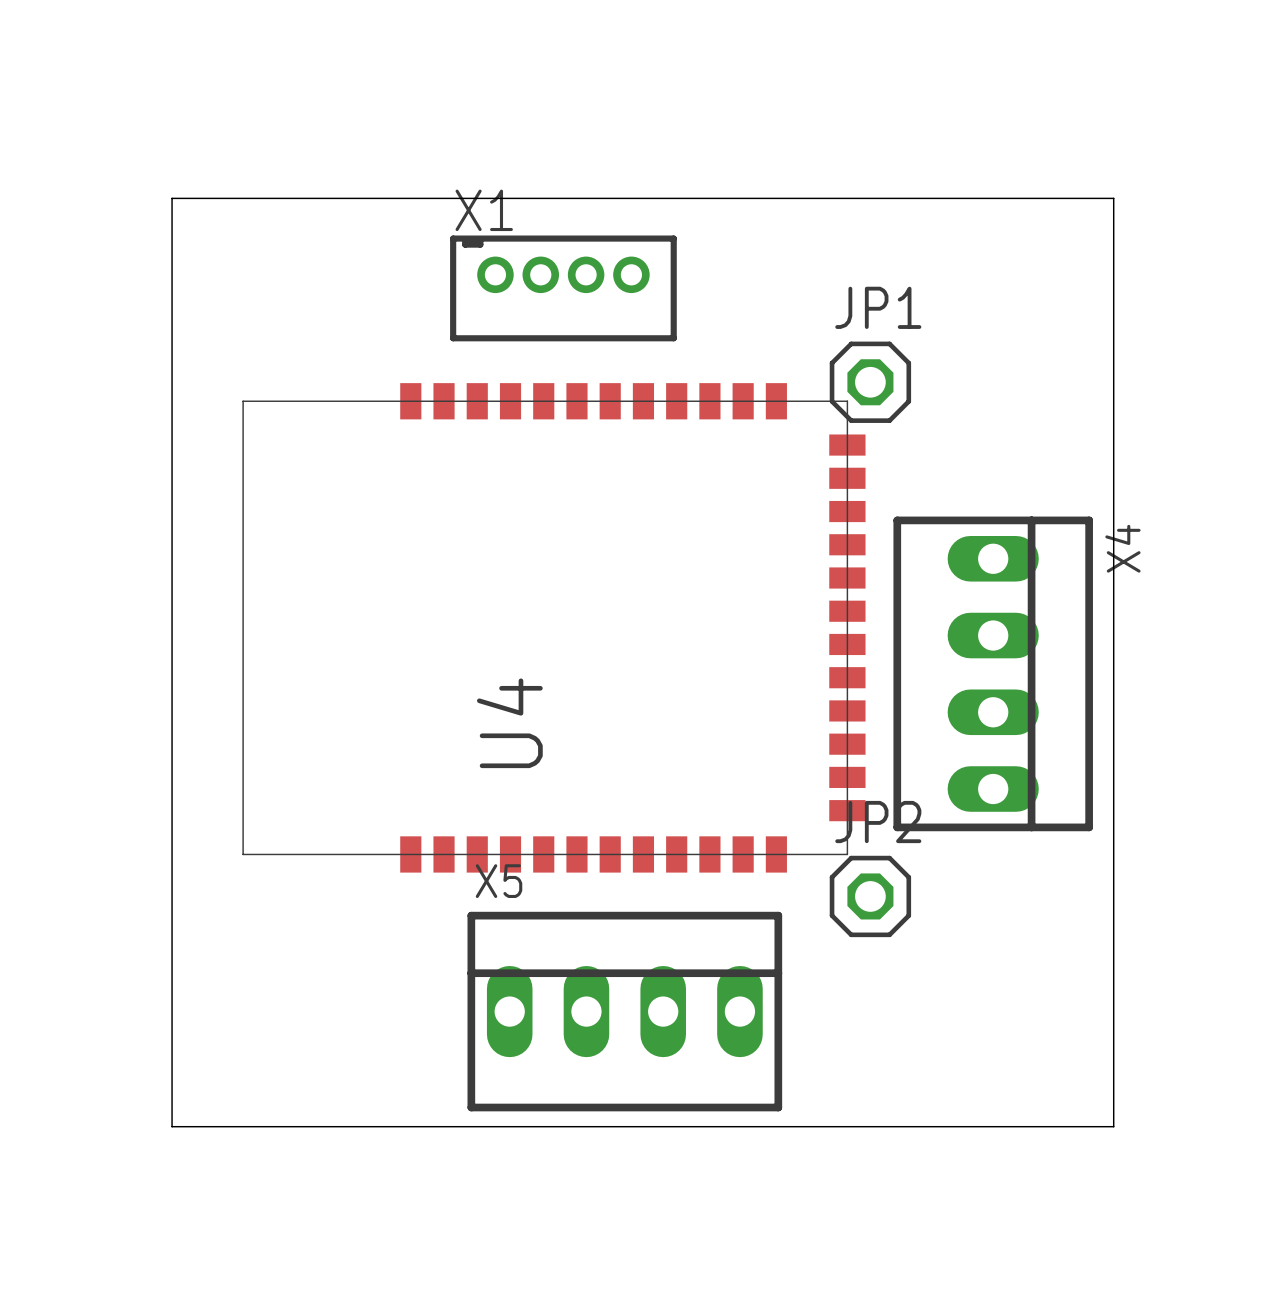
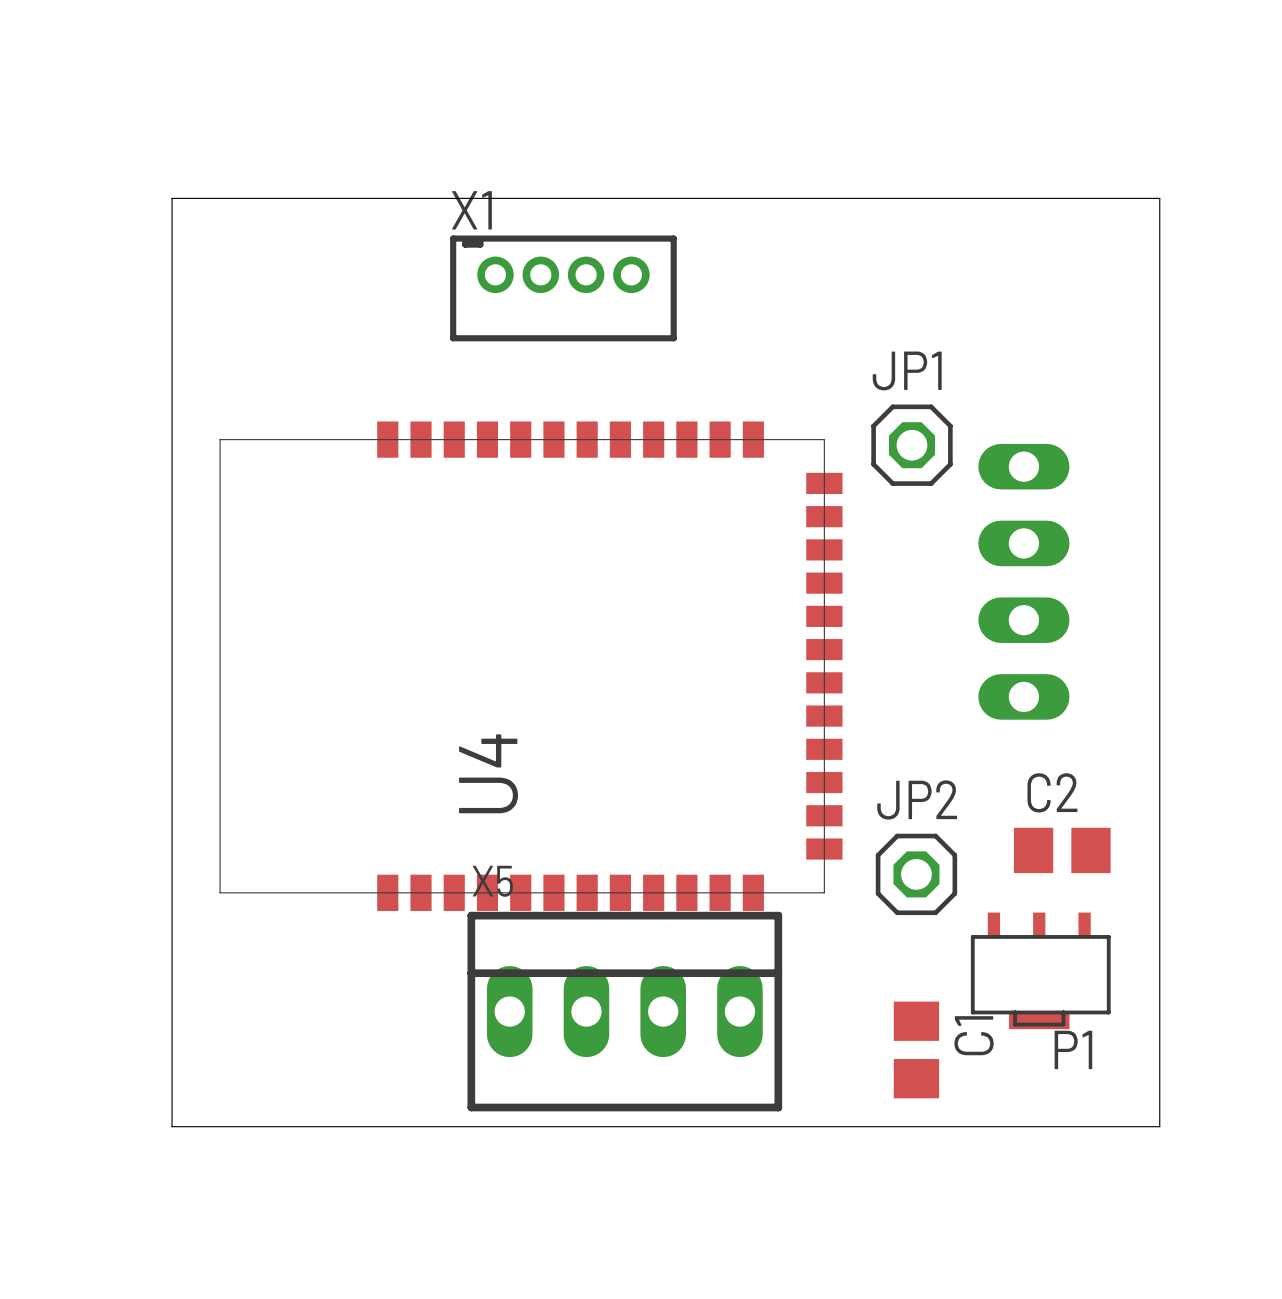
board edge: (1113, 198) (1113, 1126) -> (1113, 198) (1159, 198) (1159, 1126) (1113, 1126)
JP1 position: (870, 382) -> (911, 445)
U4 position: (554, 627) -> (531, 666)
X4 side: top (993, 673) -> bottom (1023, 581)
C2: none -> (1062, 850)
JP2 position: (870, 896) -> (916, 874)
P1: none -> (1040, 970)
C1: none -> (916, 1049)

